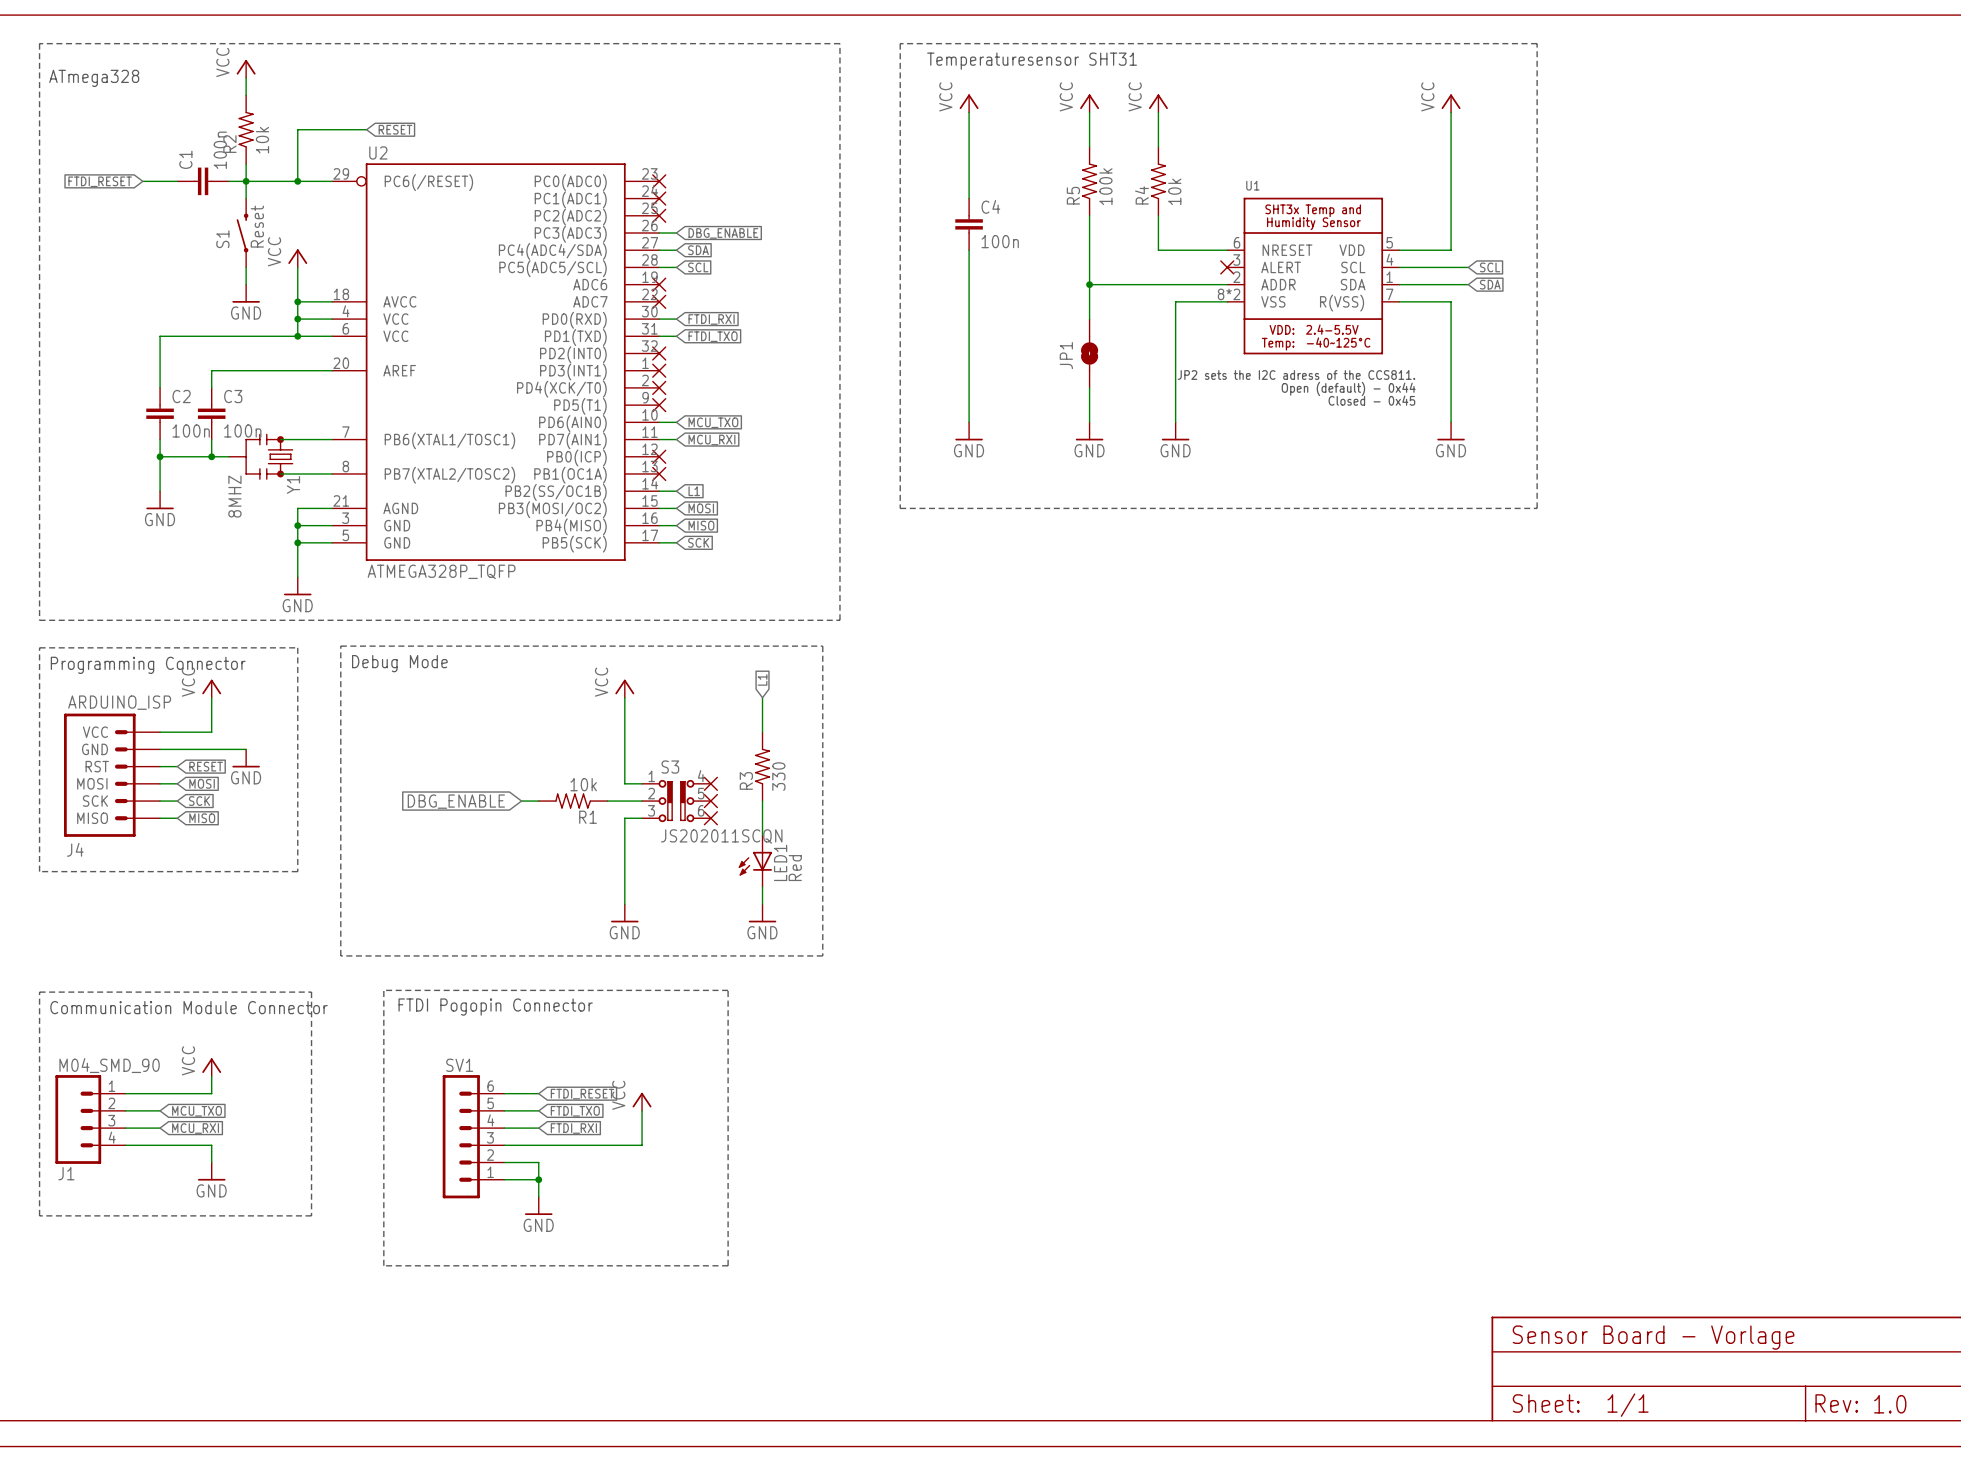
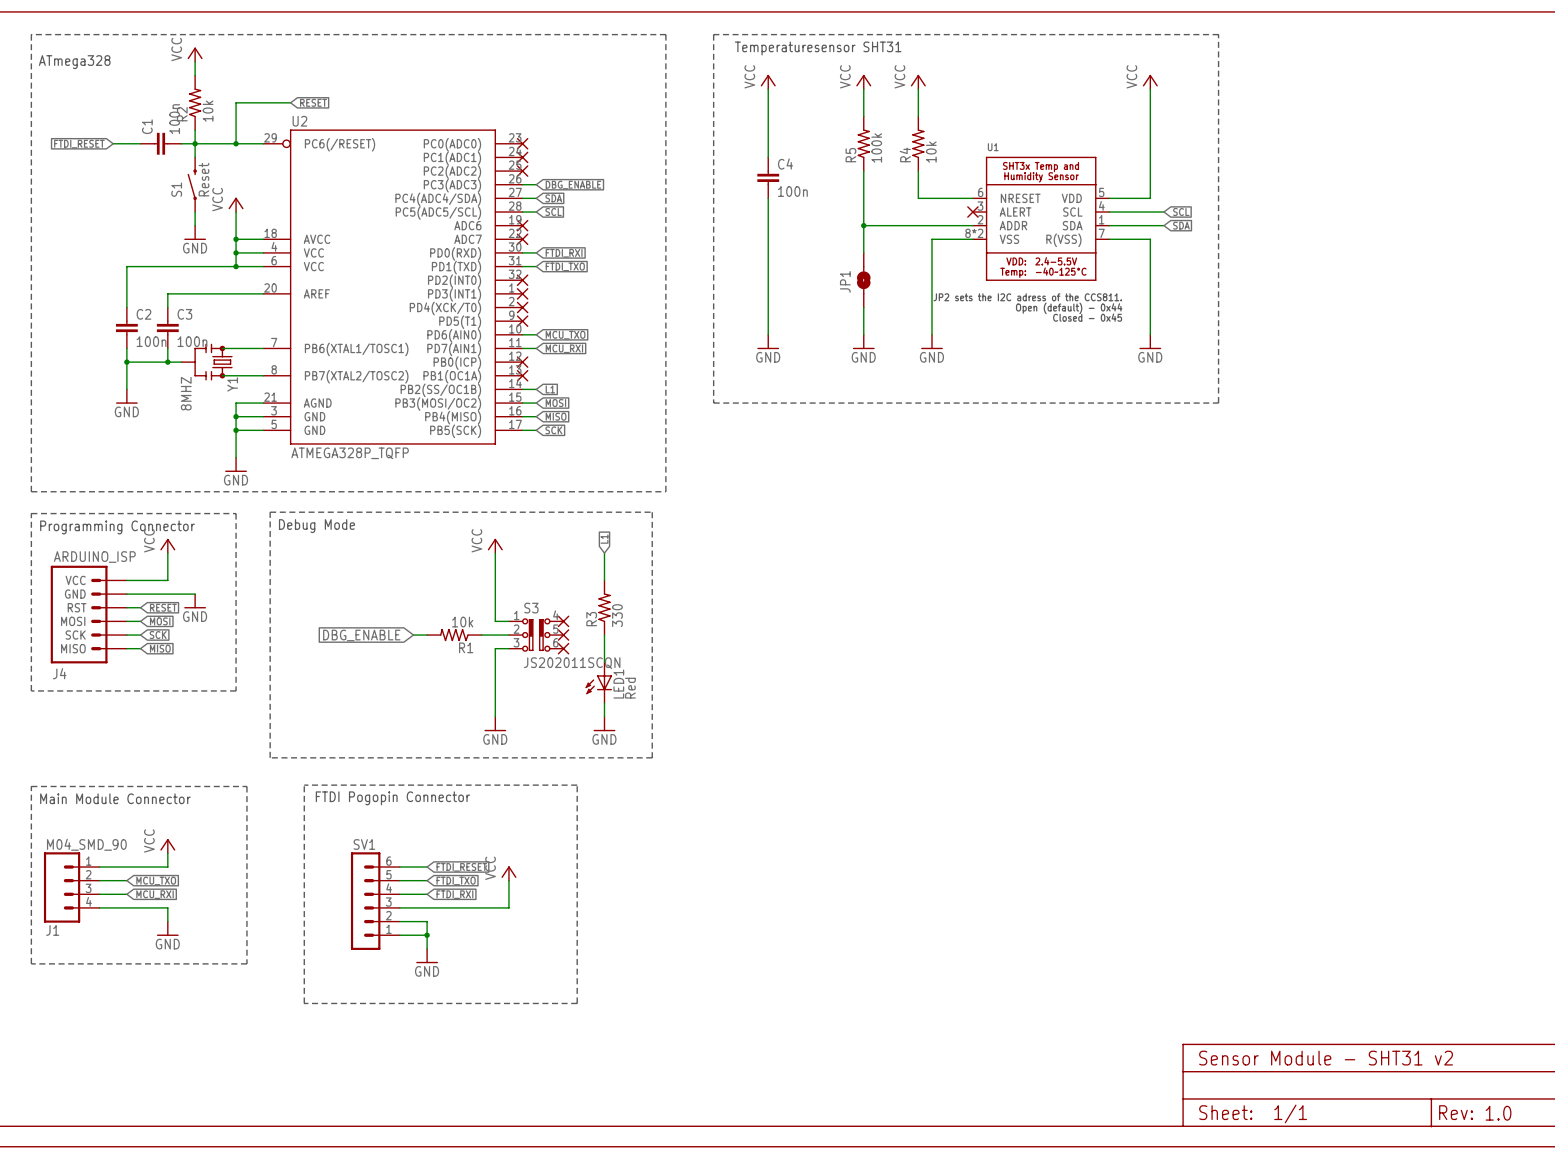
text: Communication Module Connector (189, 1007) -> Main Module Connector (115, 798)
text: Sensor Board - Vorlage (1653, 1337) -> Sensor Module - SHT31 v2 (1326, 1058)

